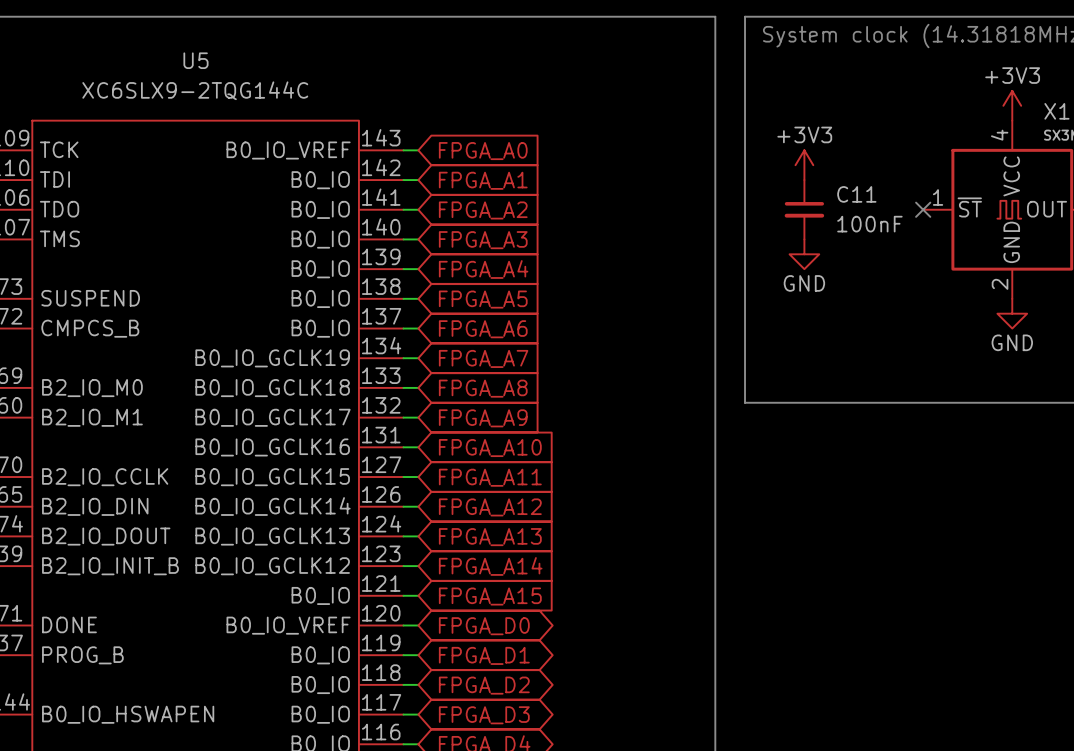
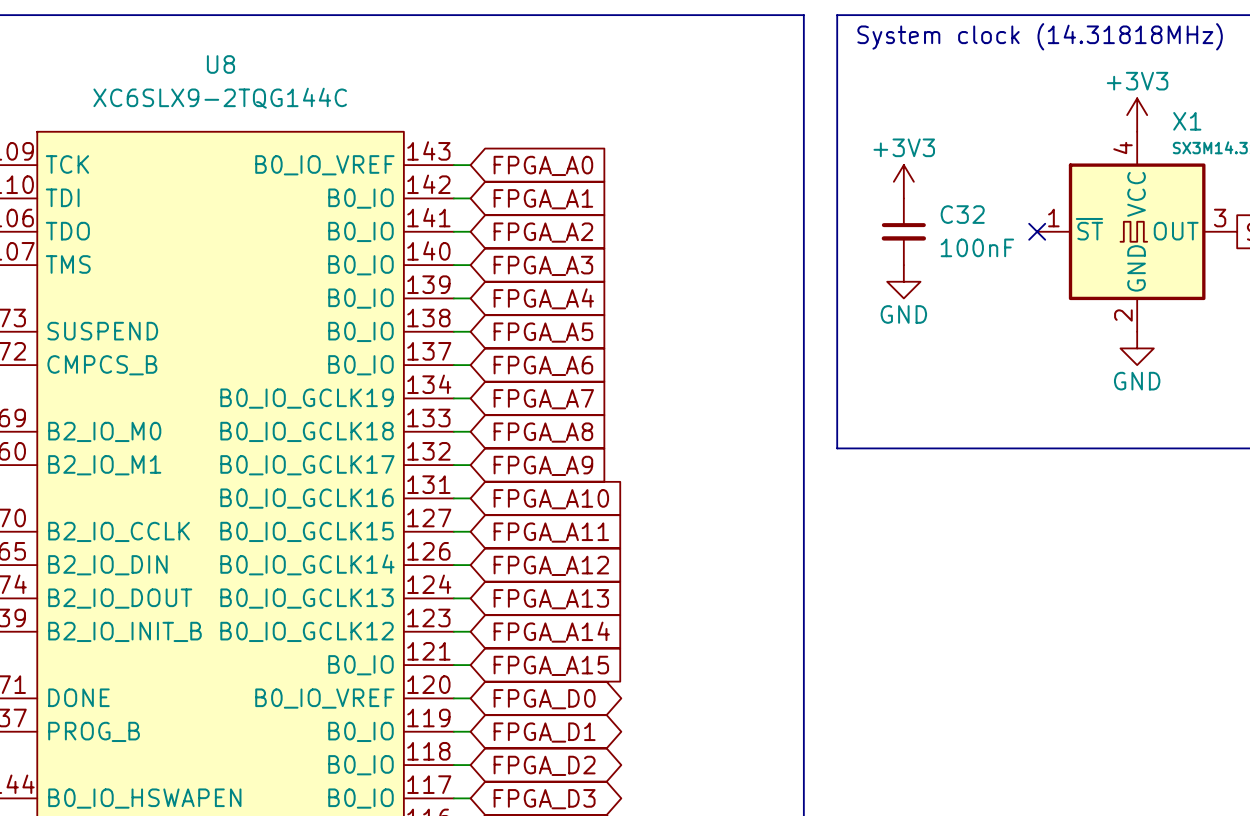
U5 name: U5 (195, 60) -> U8 (220, 64)
C11 name: C11 (856, 194) -> C32 (962, 214)

